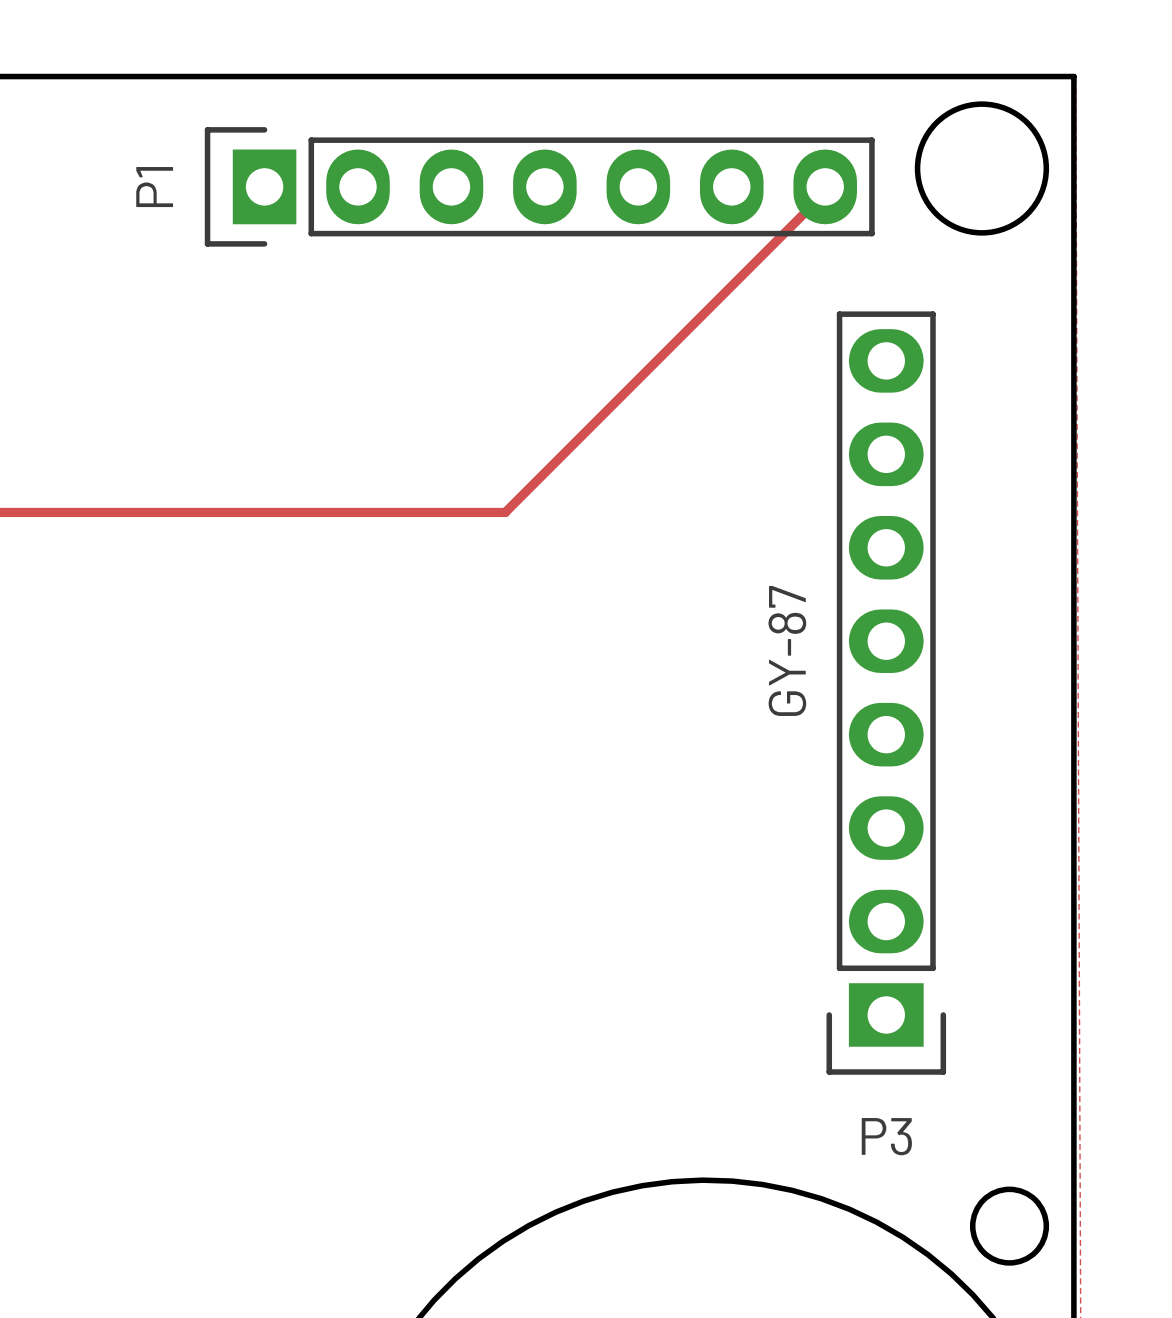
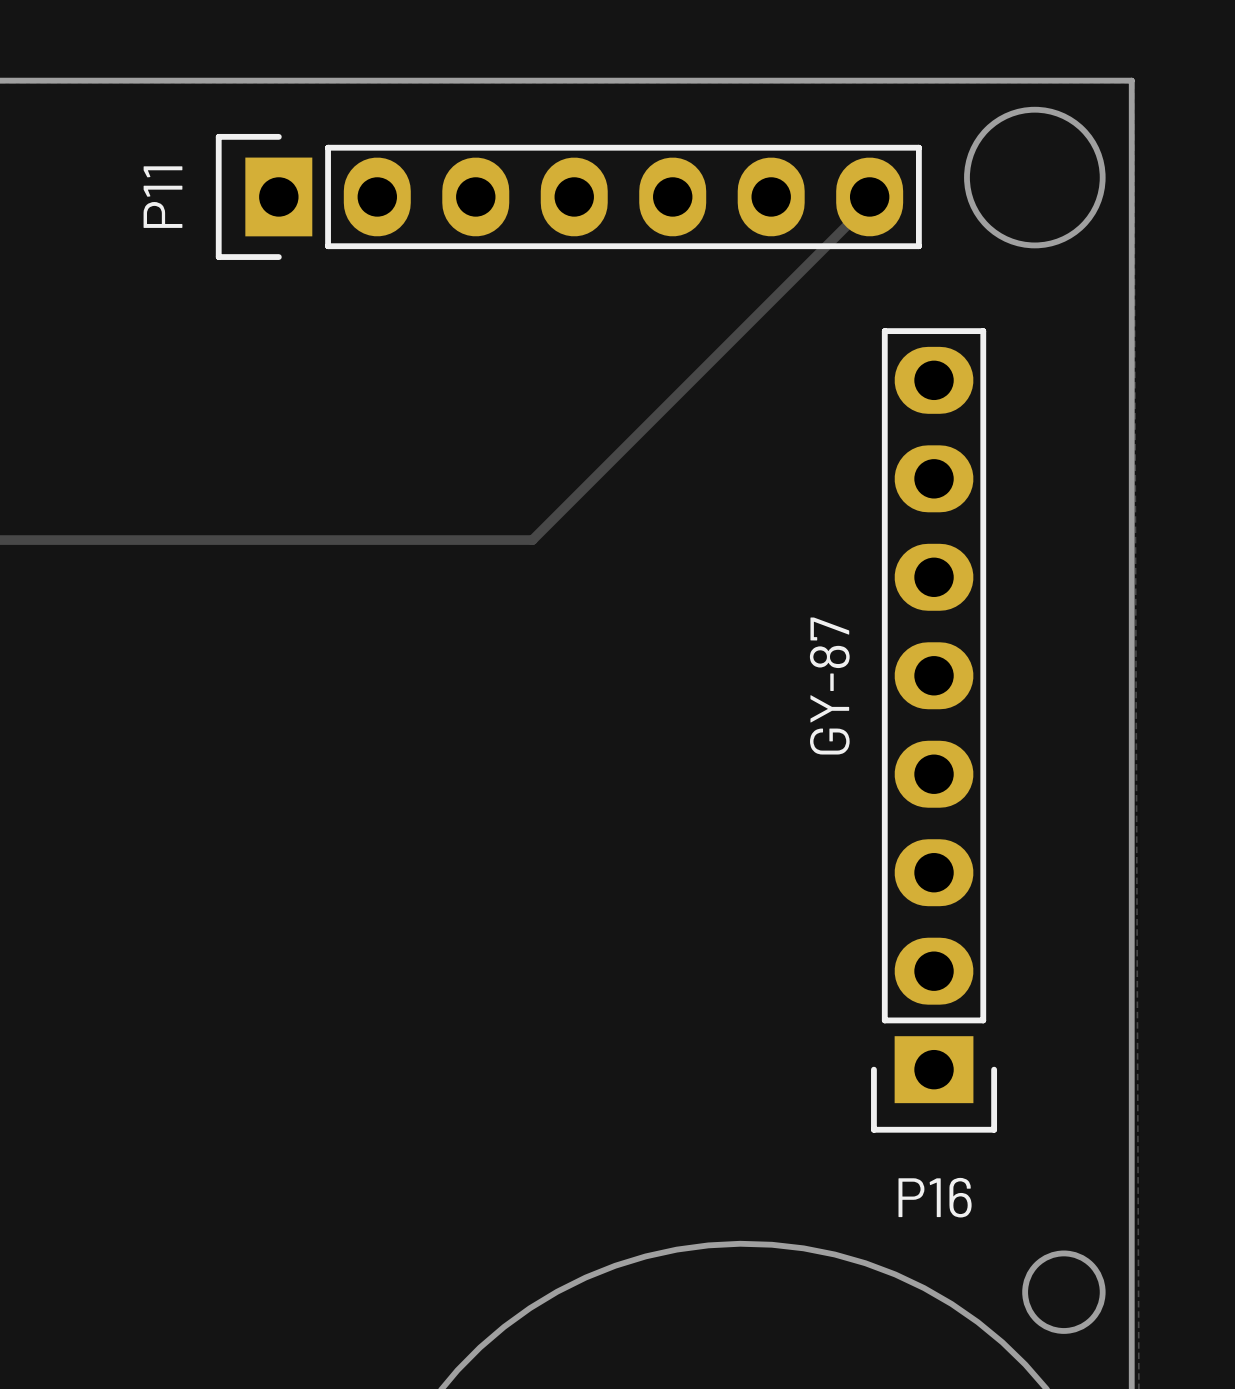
P1 name: P1 (154, 187) -> P11 (162, 197)
P3 name: P3 (886, 1136) -> P16 (935, 1197)

